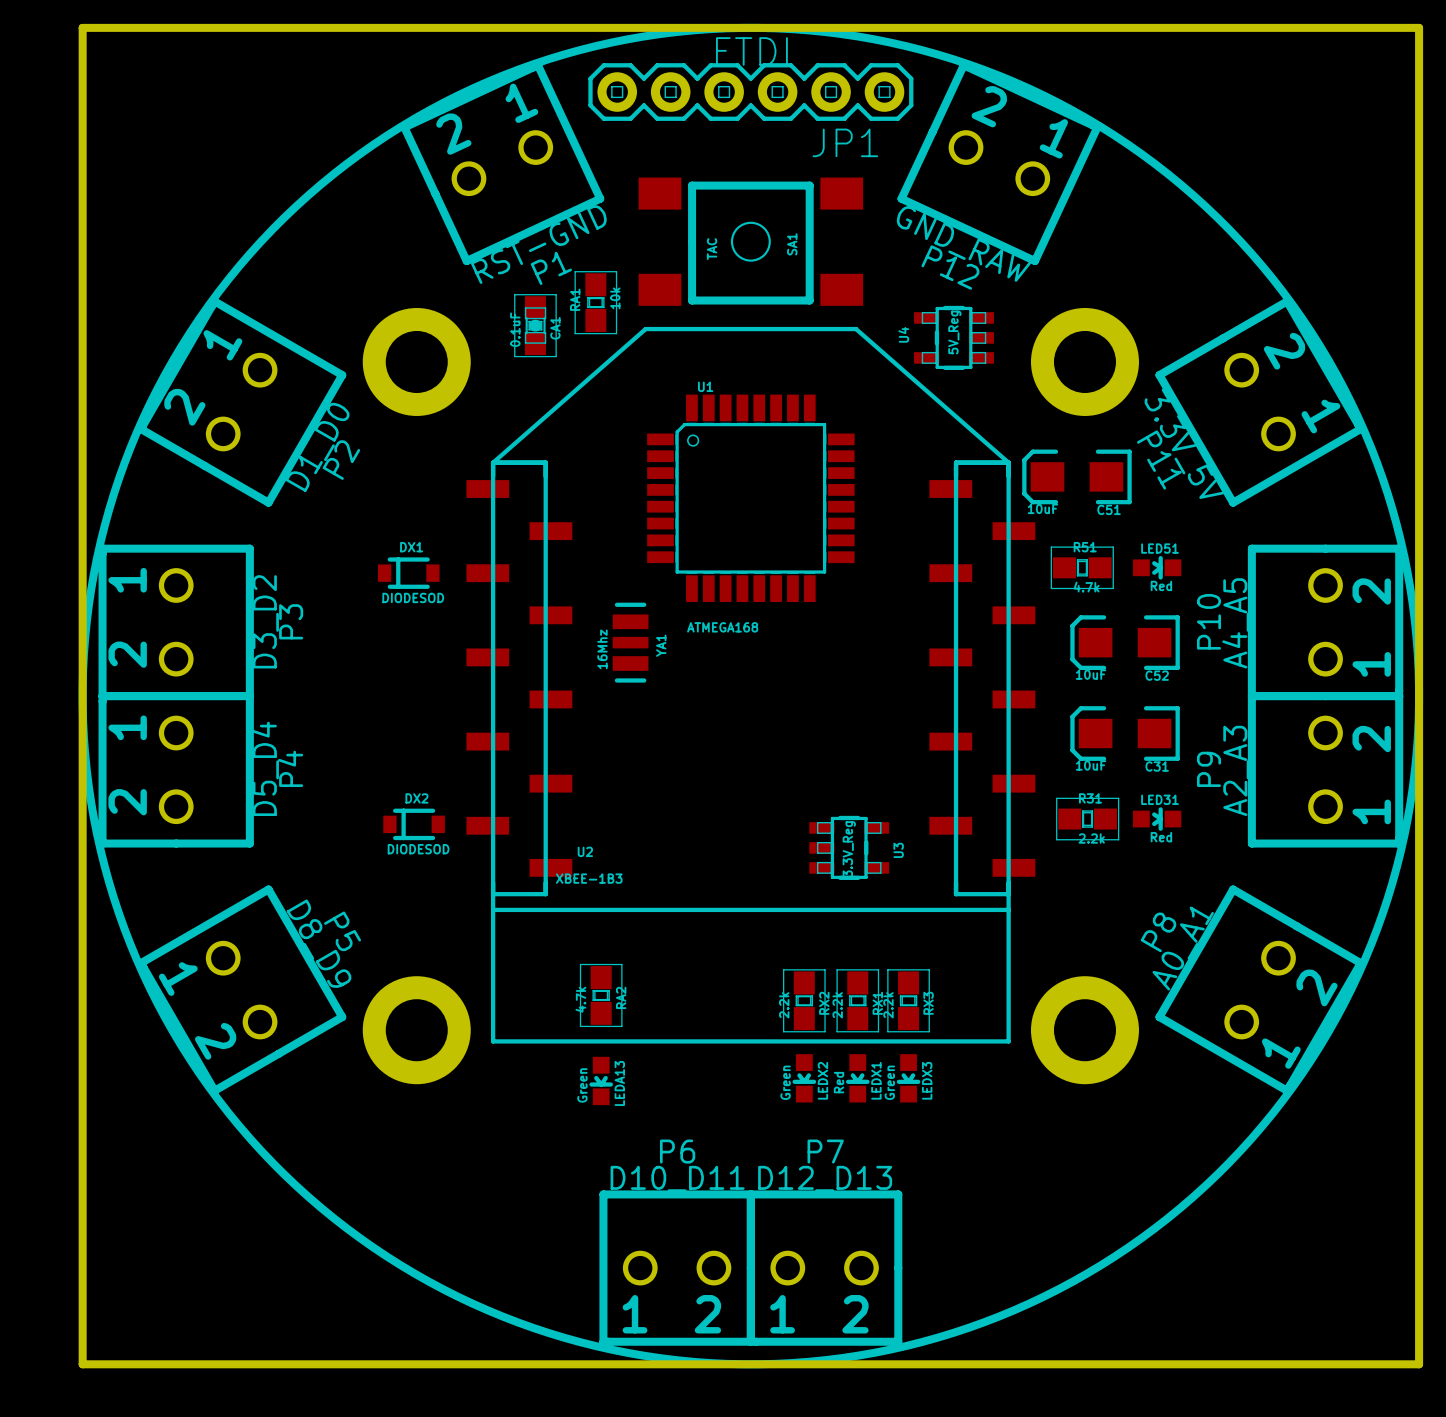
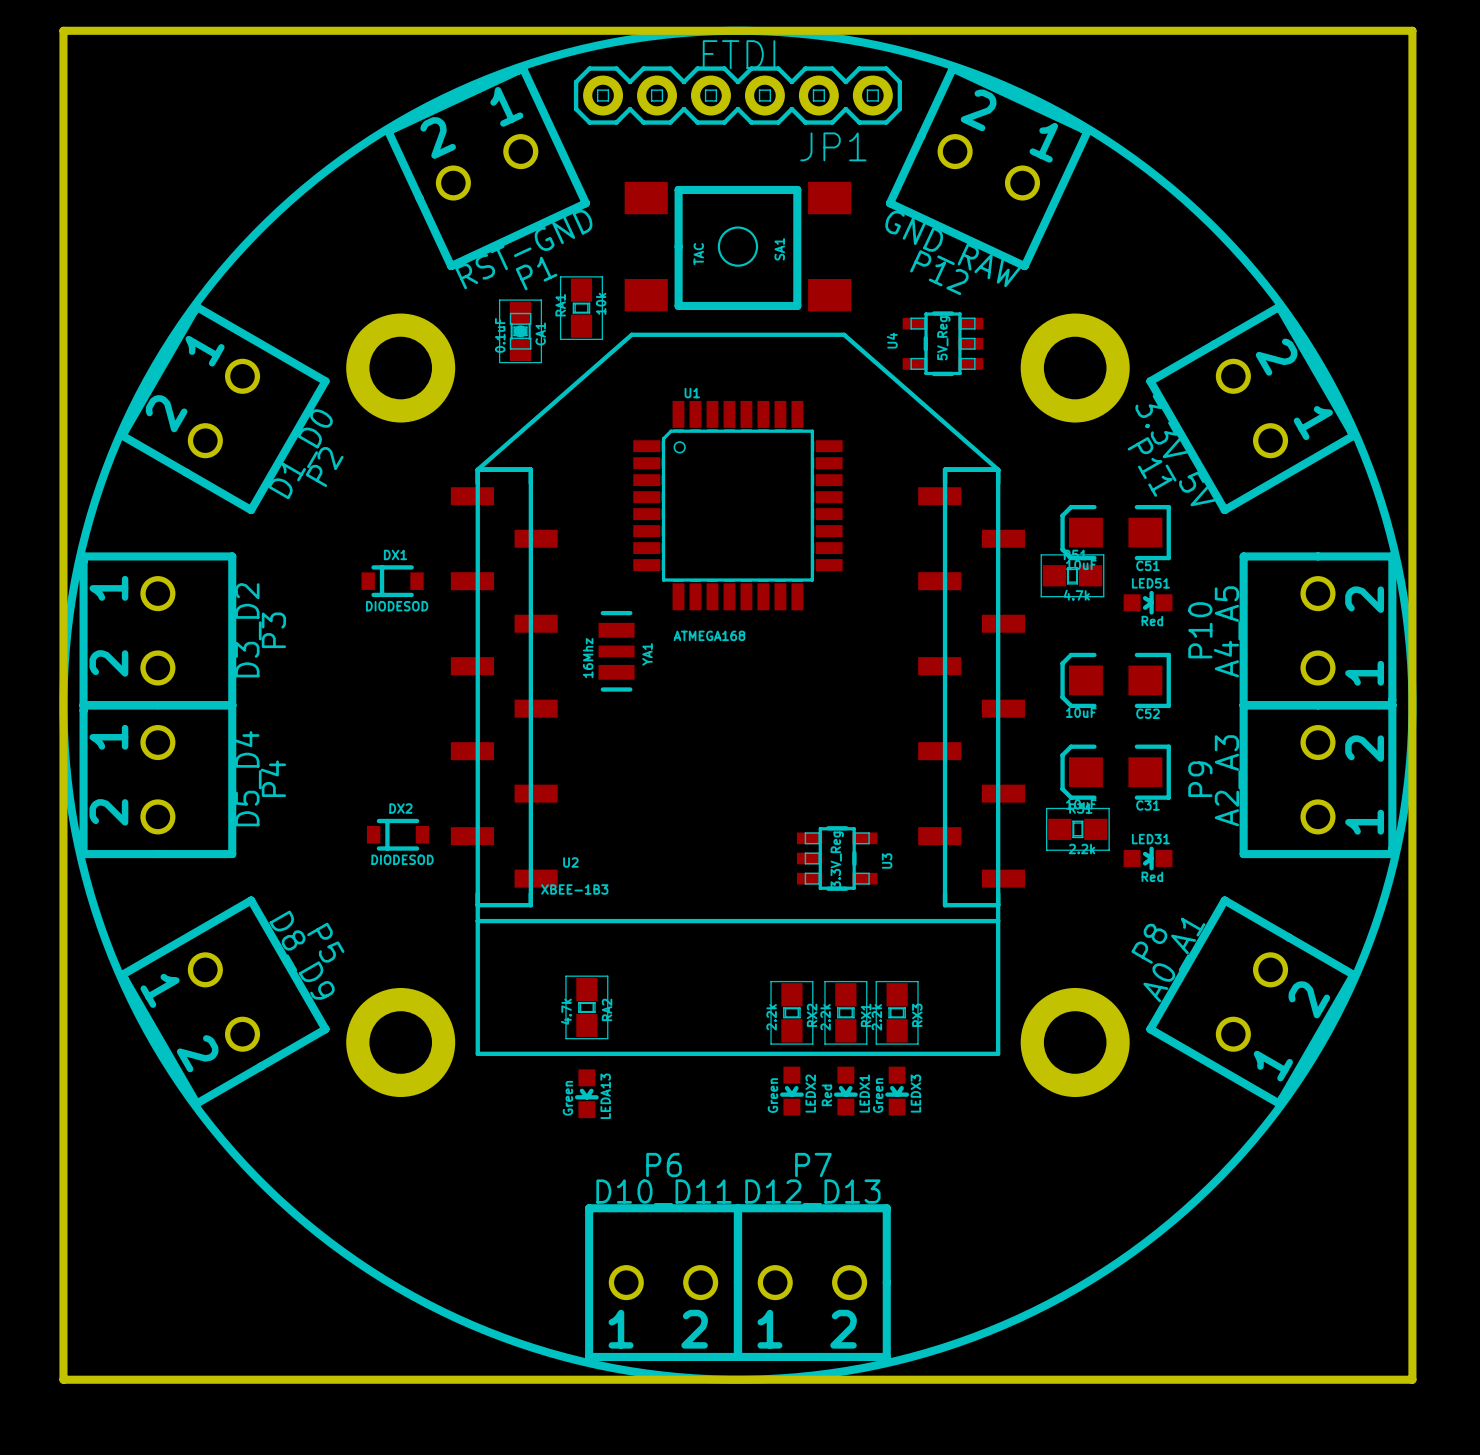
C51 position: (1076, 476) -> (1115, 532)
LED51 position: (1157, 567) -> (1148, 602)
C52 position: (1125, 642) -> (1115, 680)
C31 position: (1125, 733) -> (1115, 772)
LED31 position: (1157, 819) -> (1148, 858)

